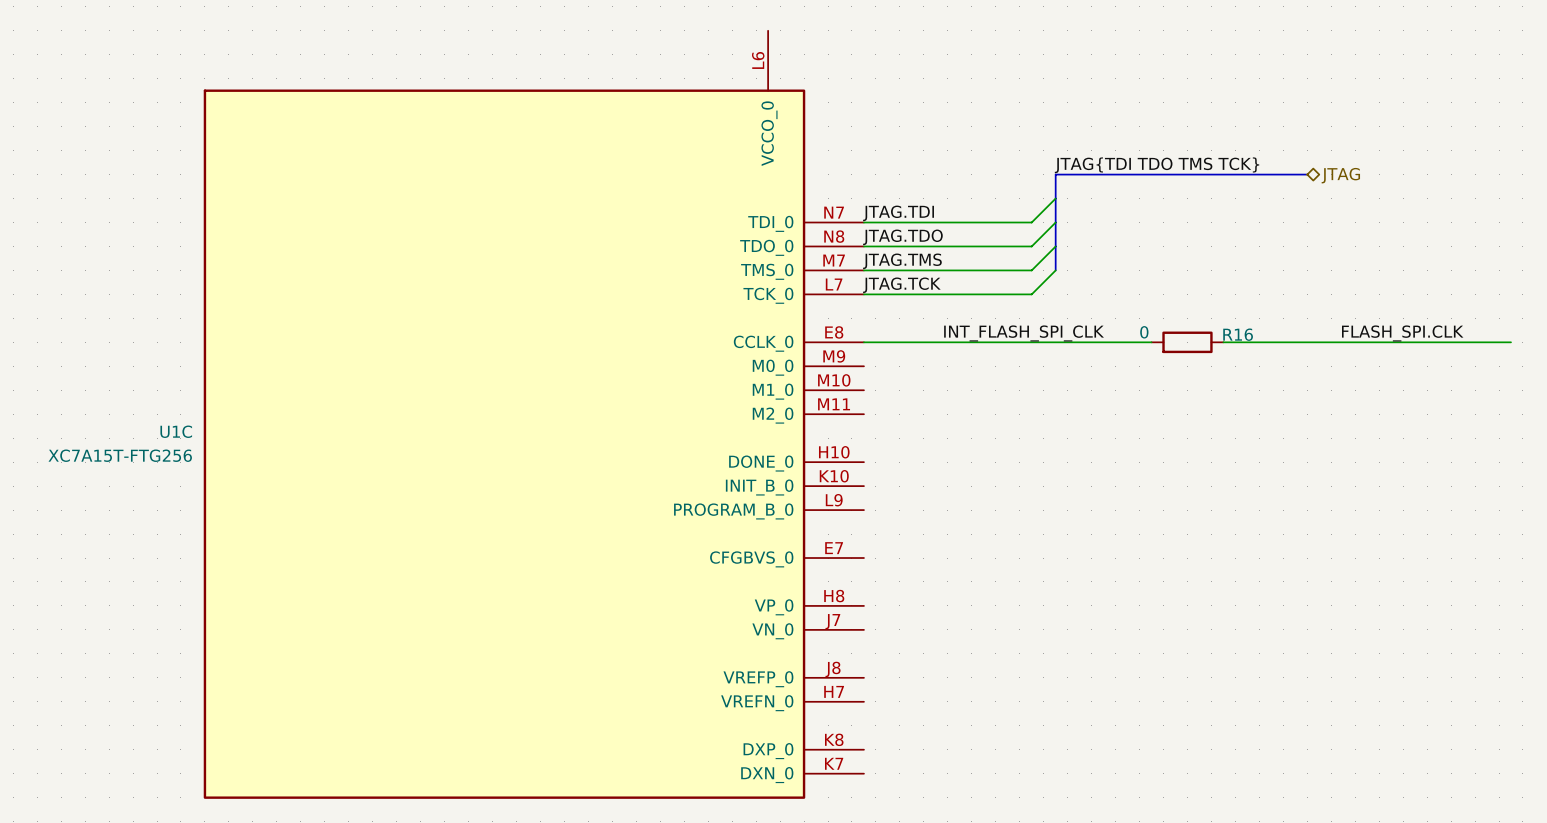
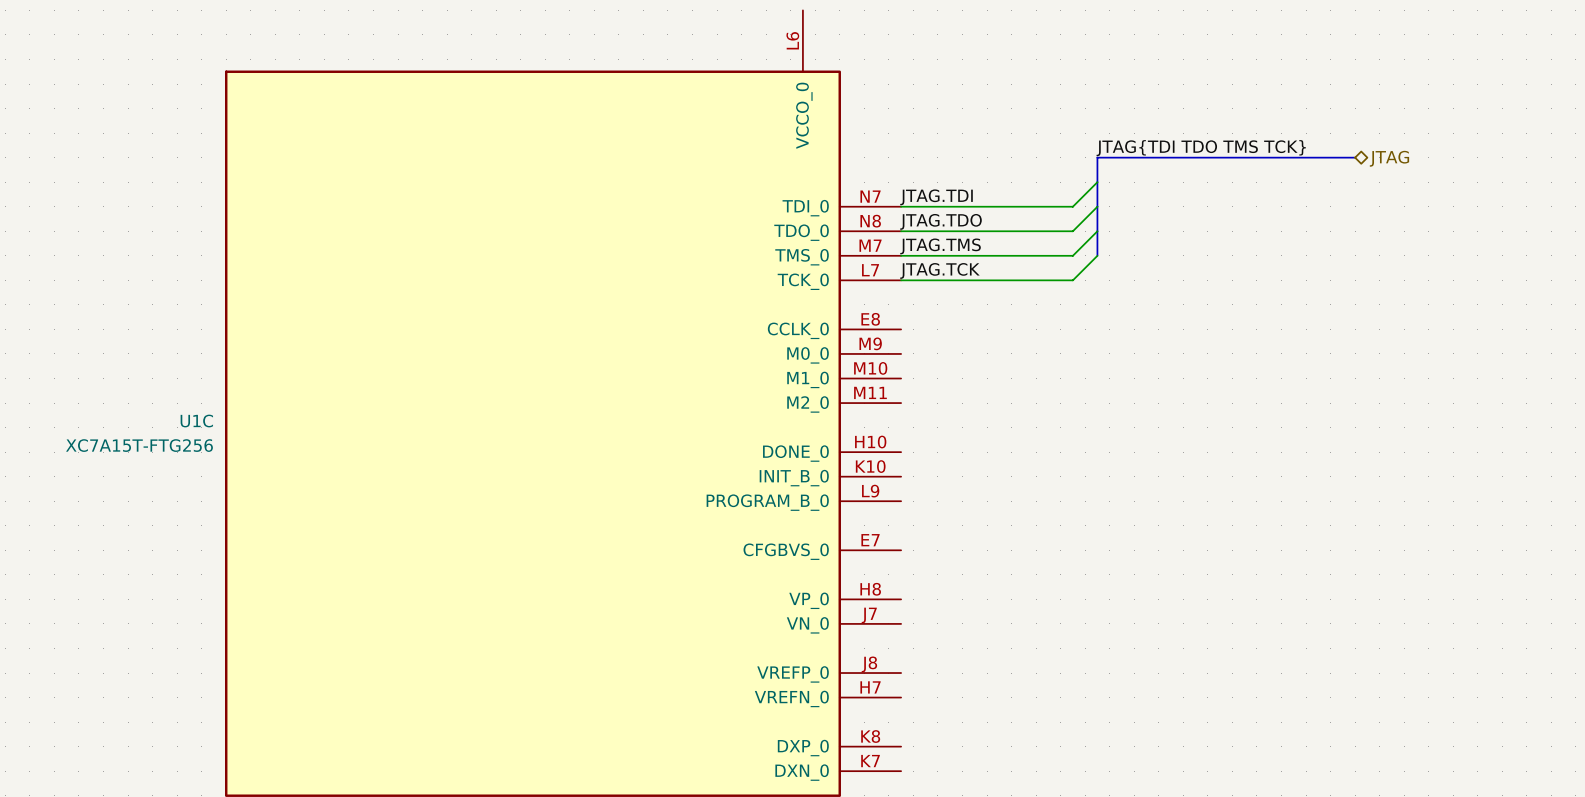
label: INT_FLASH_SPI_CLK (1024, 333) -> none
label: FLASH_SPI.CLK (1402, 333) -> none
wire: (863, 342) (1151, 342) -> none
R16: 0 (1187, 342) -> none
wire: (1223, 342) (1511, 342) -> none

